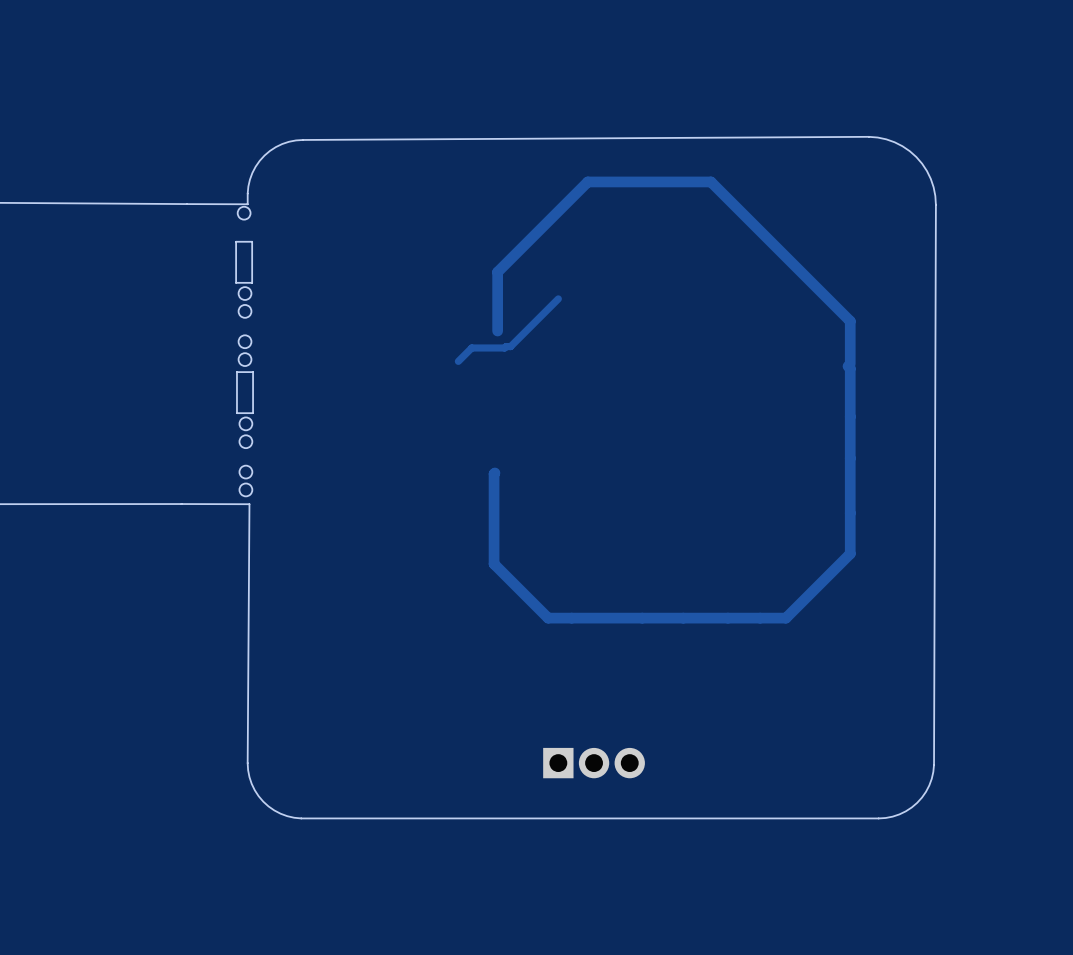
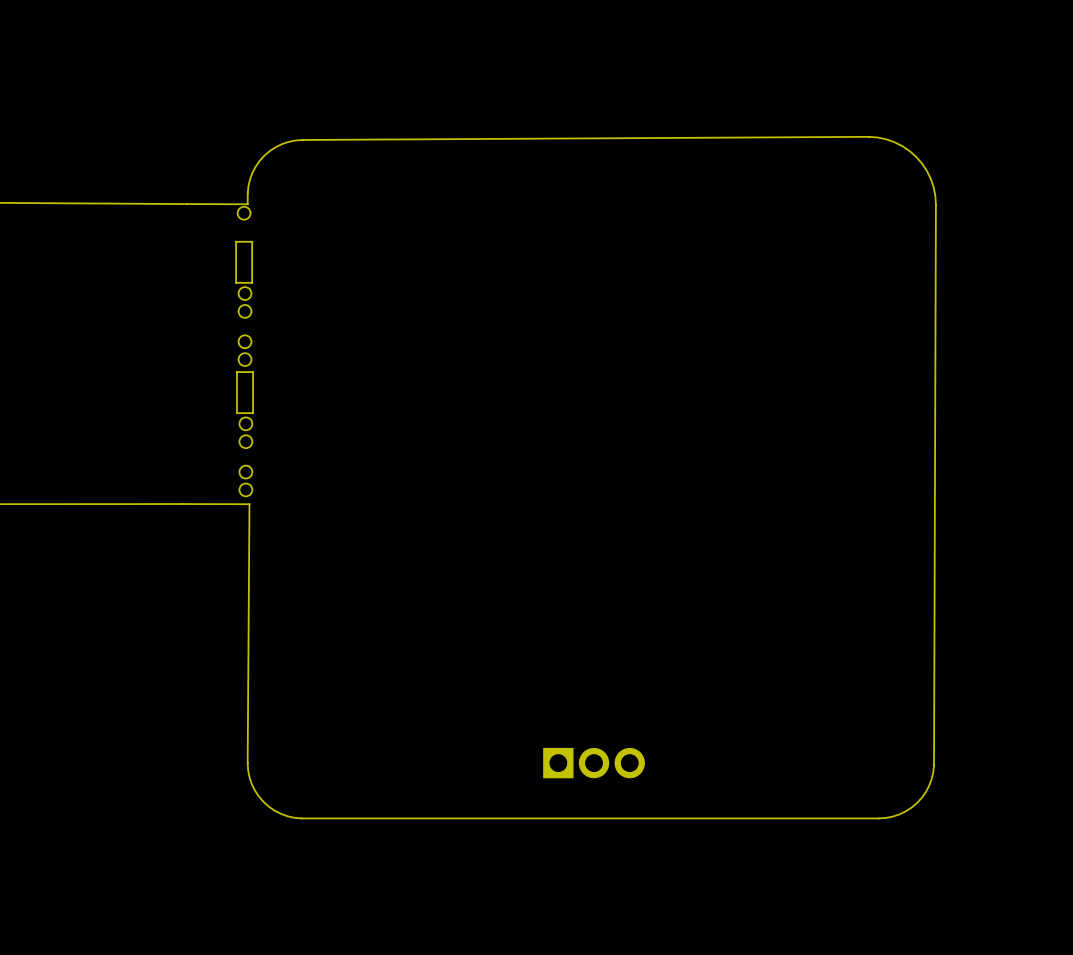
track: (558, 298) (510, 346) (471, 347) (458, 361) -> none
track: (497, 331) (497, 272) (587, 181) (710, 181) (850, 321) (850, 364) -> none
track: (848, 366) (850, 368) (850, 553) (785, 618) (548, 618) (494, 564) (494, 472) -> none

